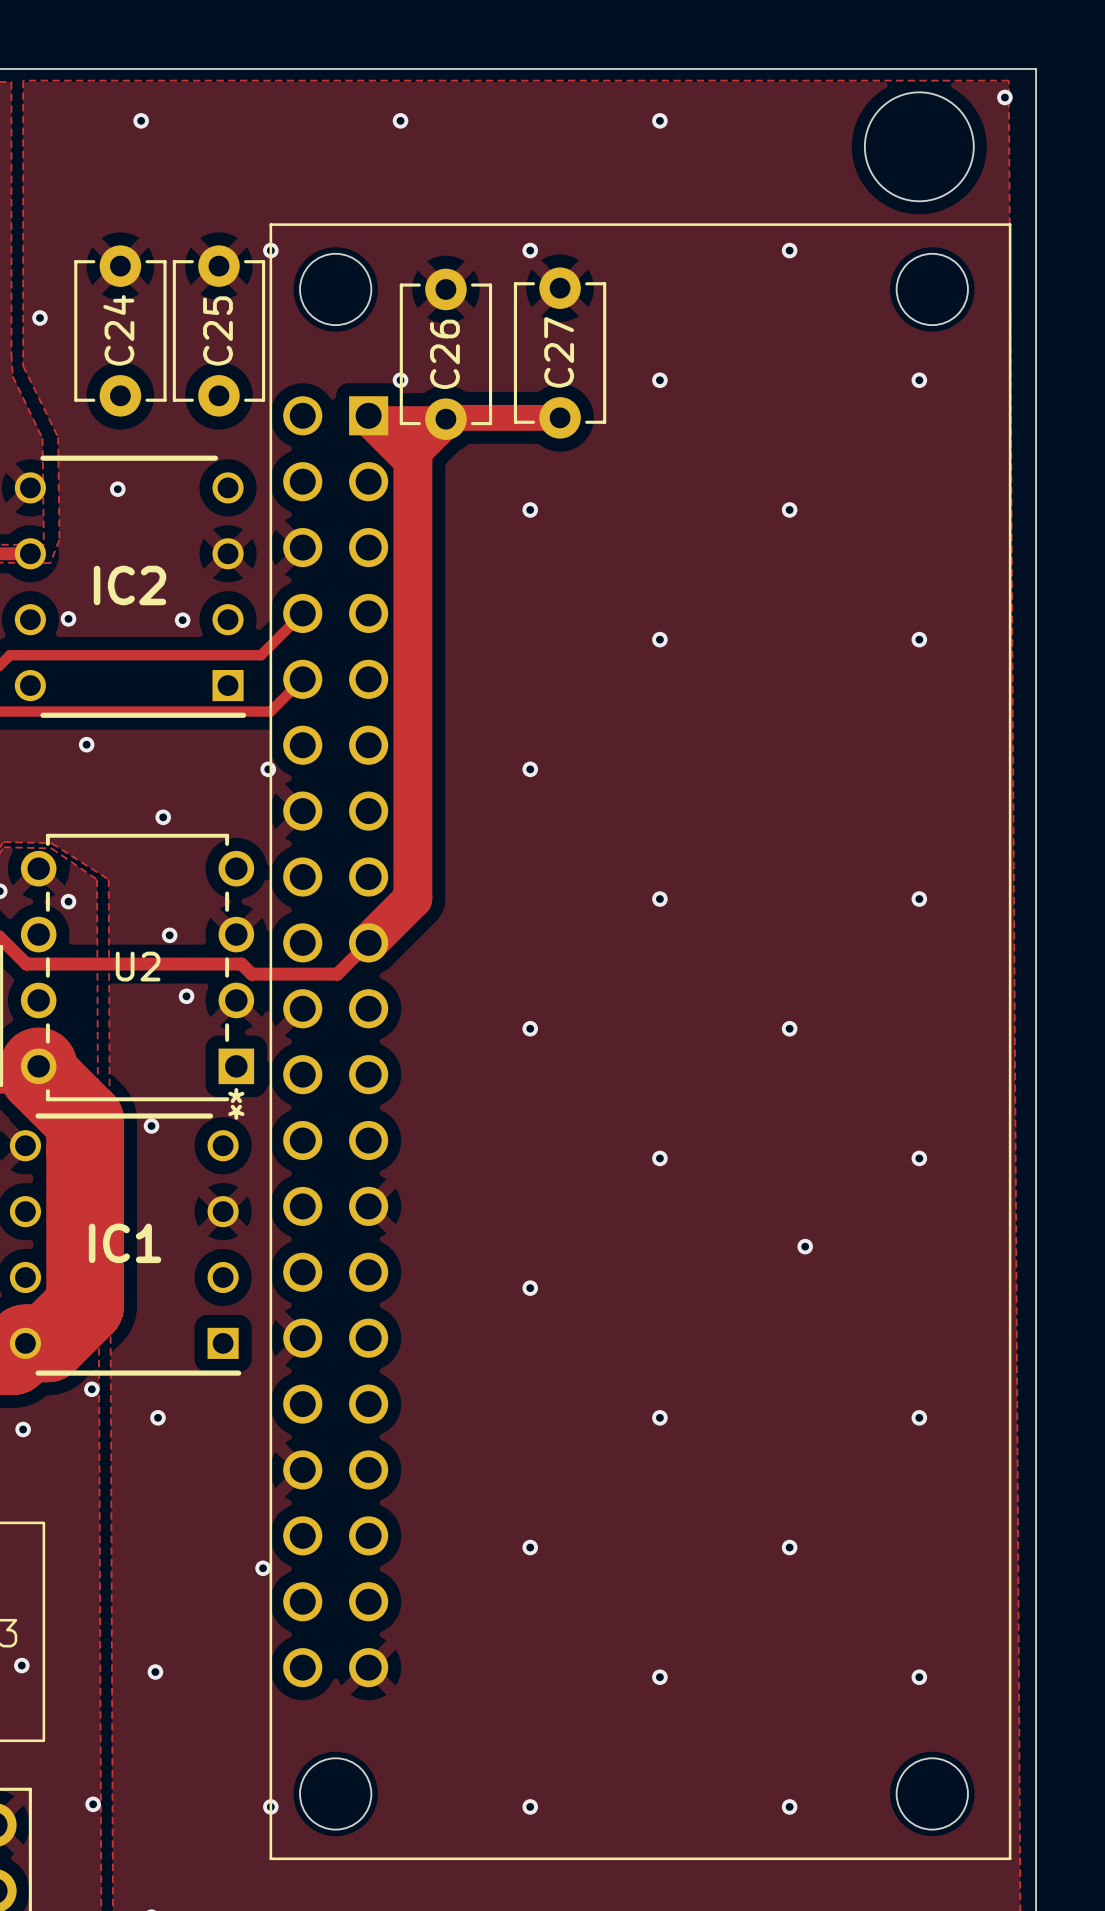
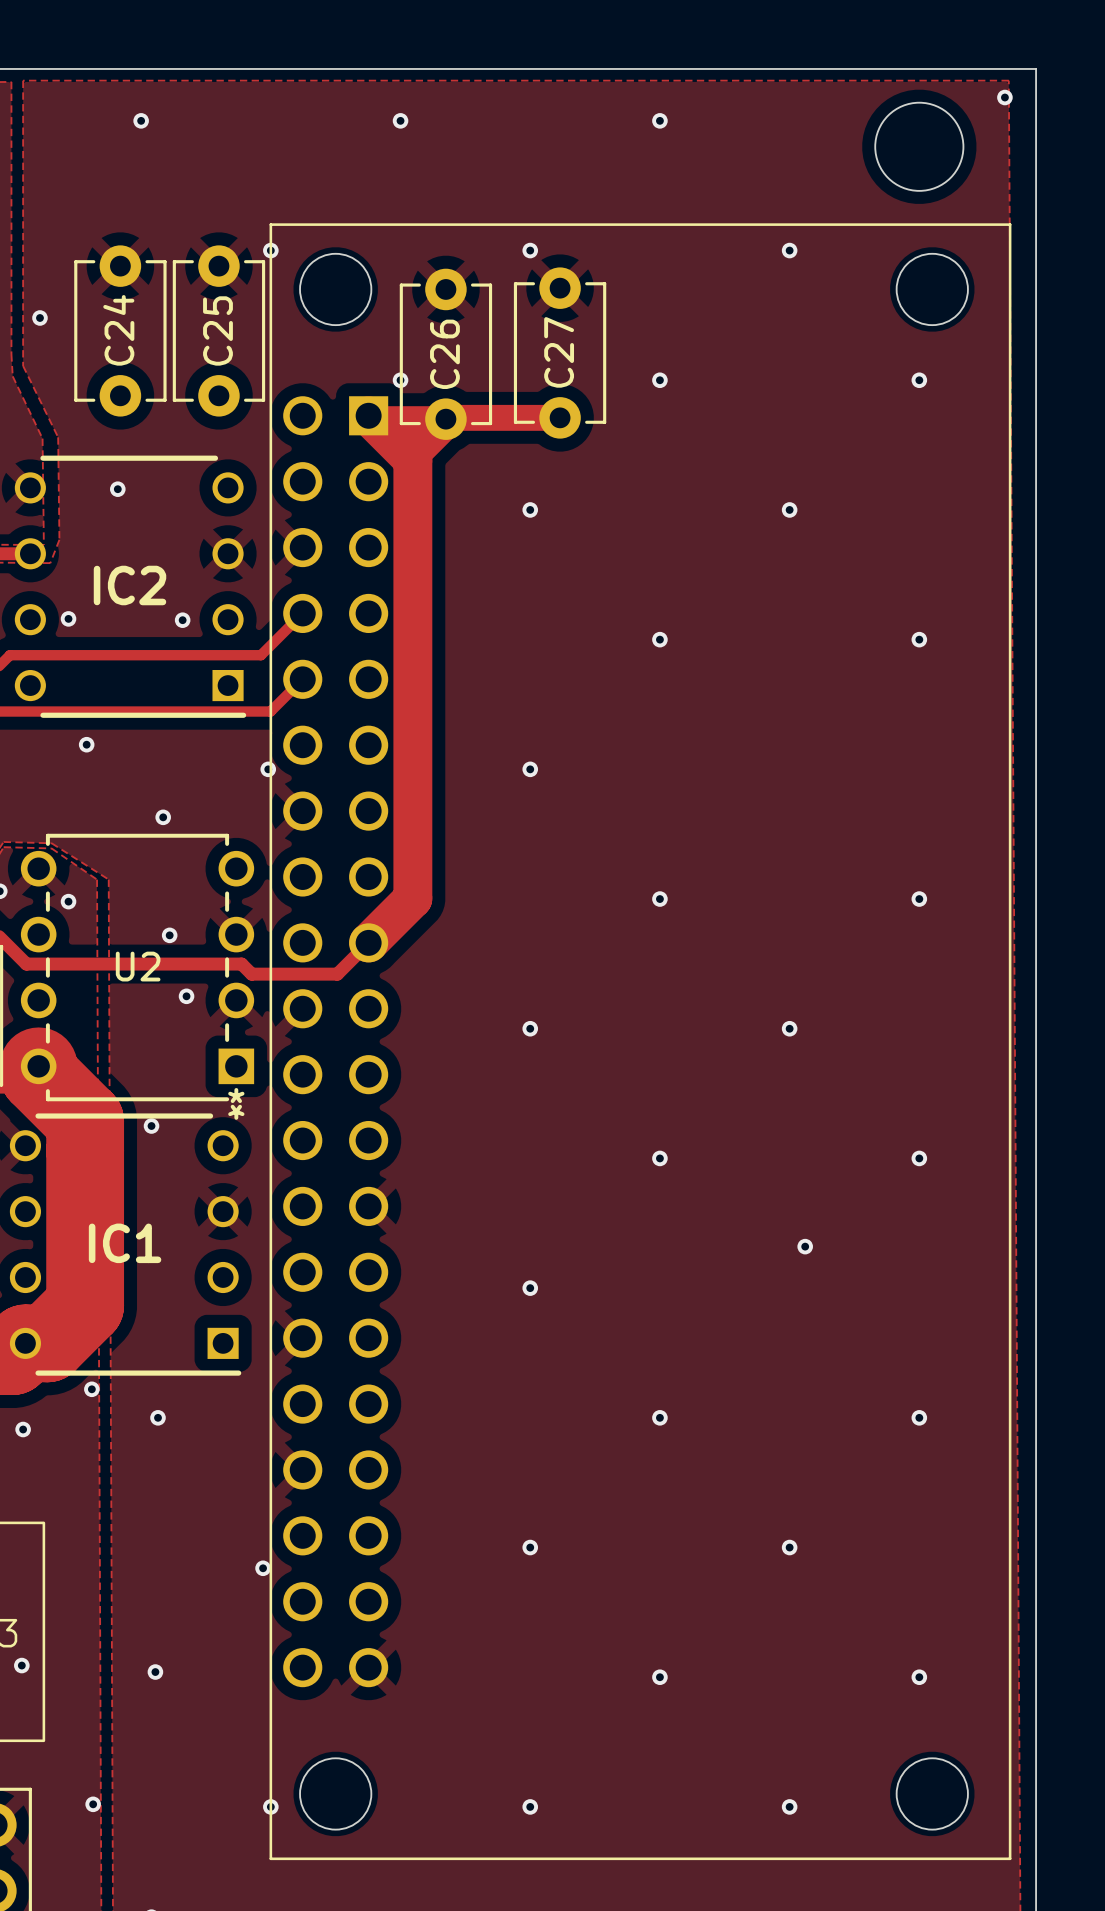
round board edge size: [864, 91, 975, 202] -> [874, 102, 965, 192]

